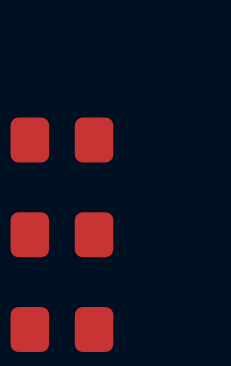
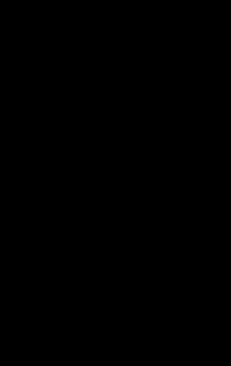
part: (61, 140) -> none
part: (61, 234) -> none
part: (61, 329) -> none

